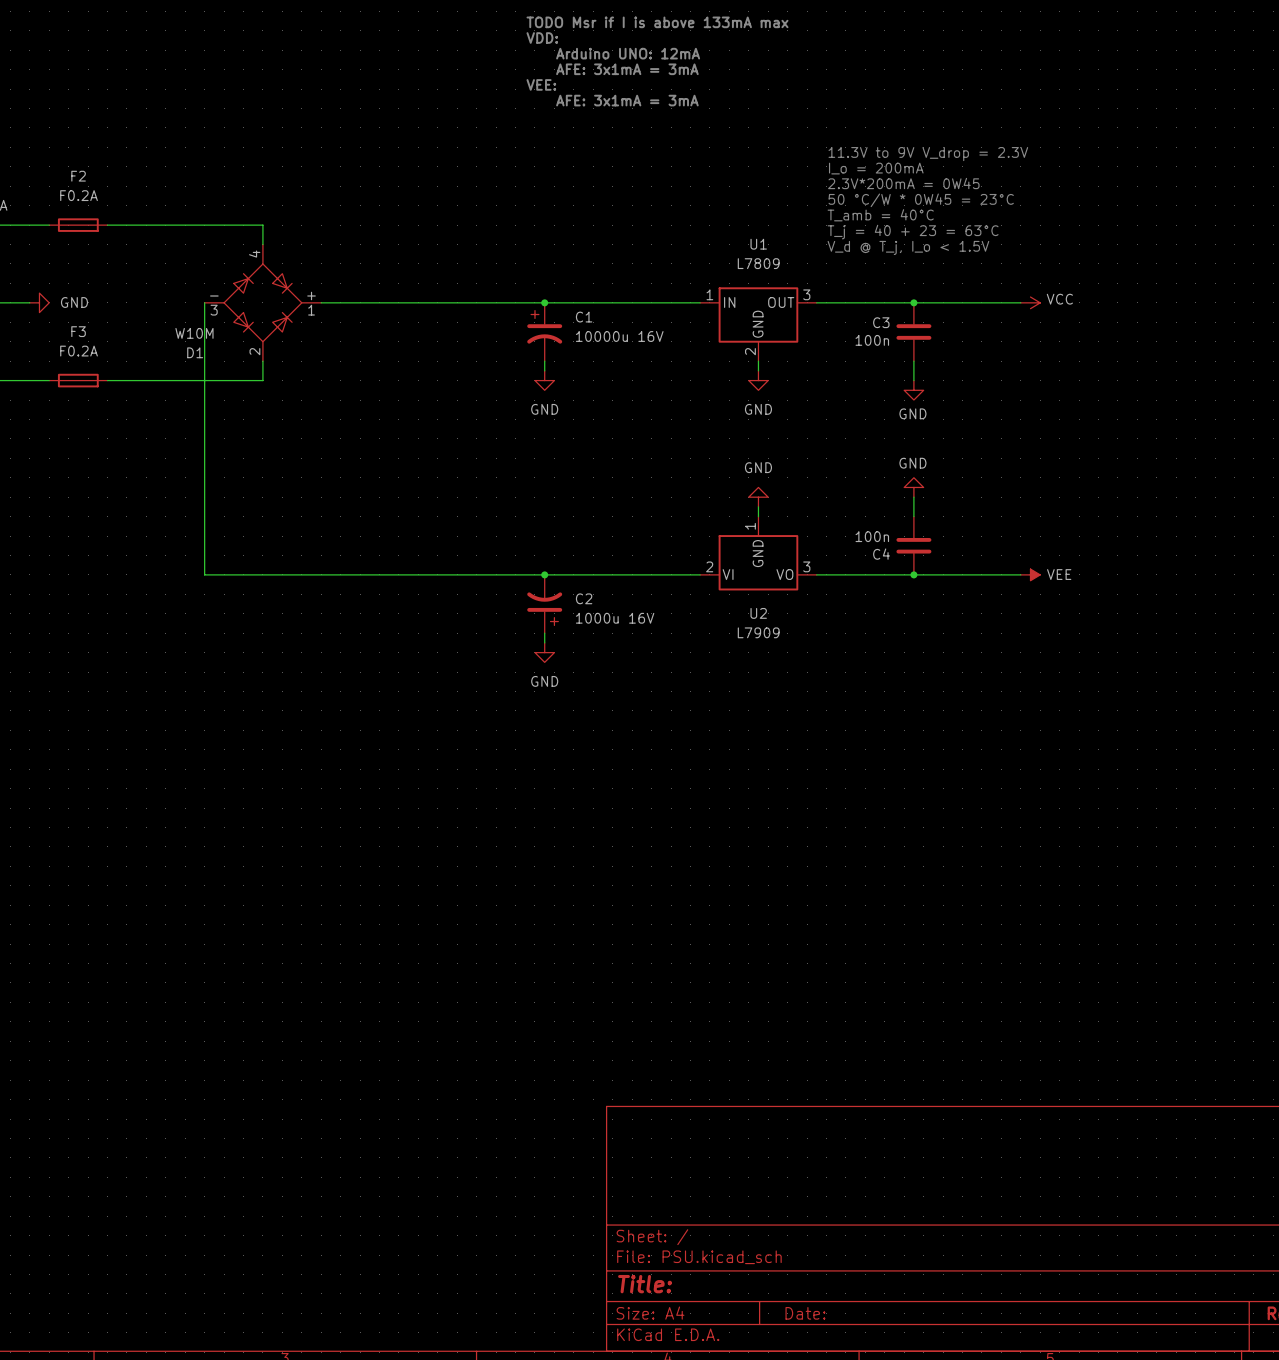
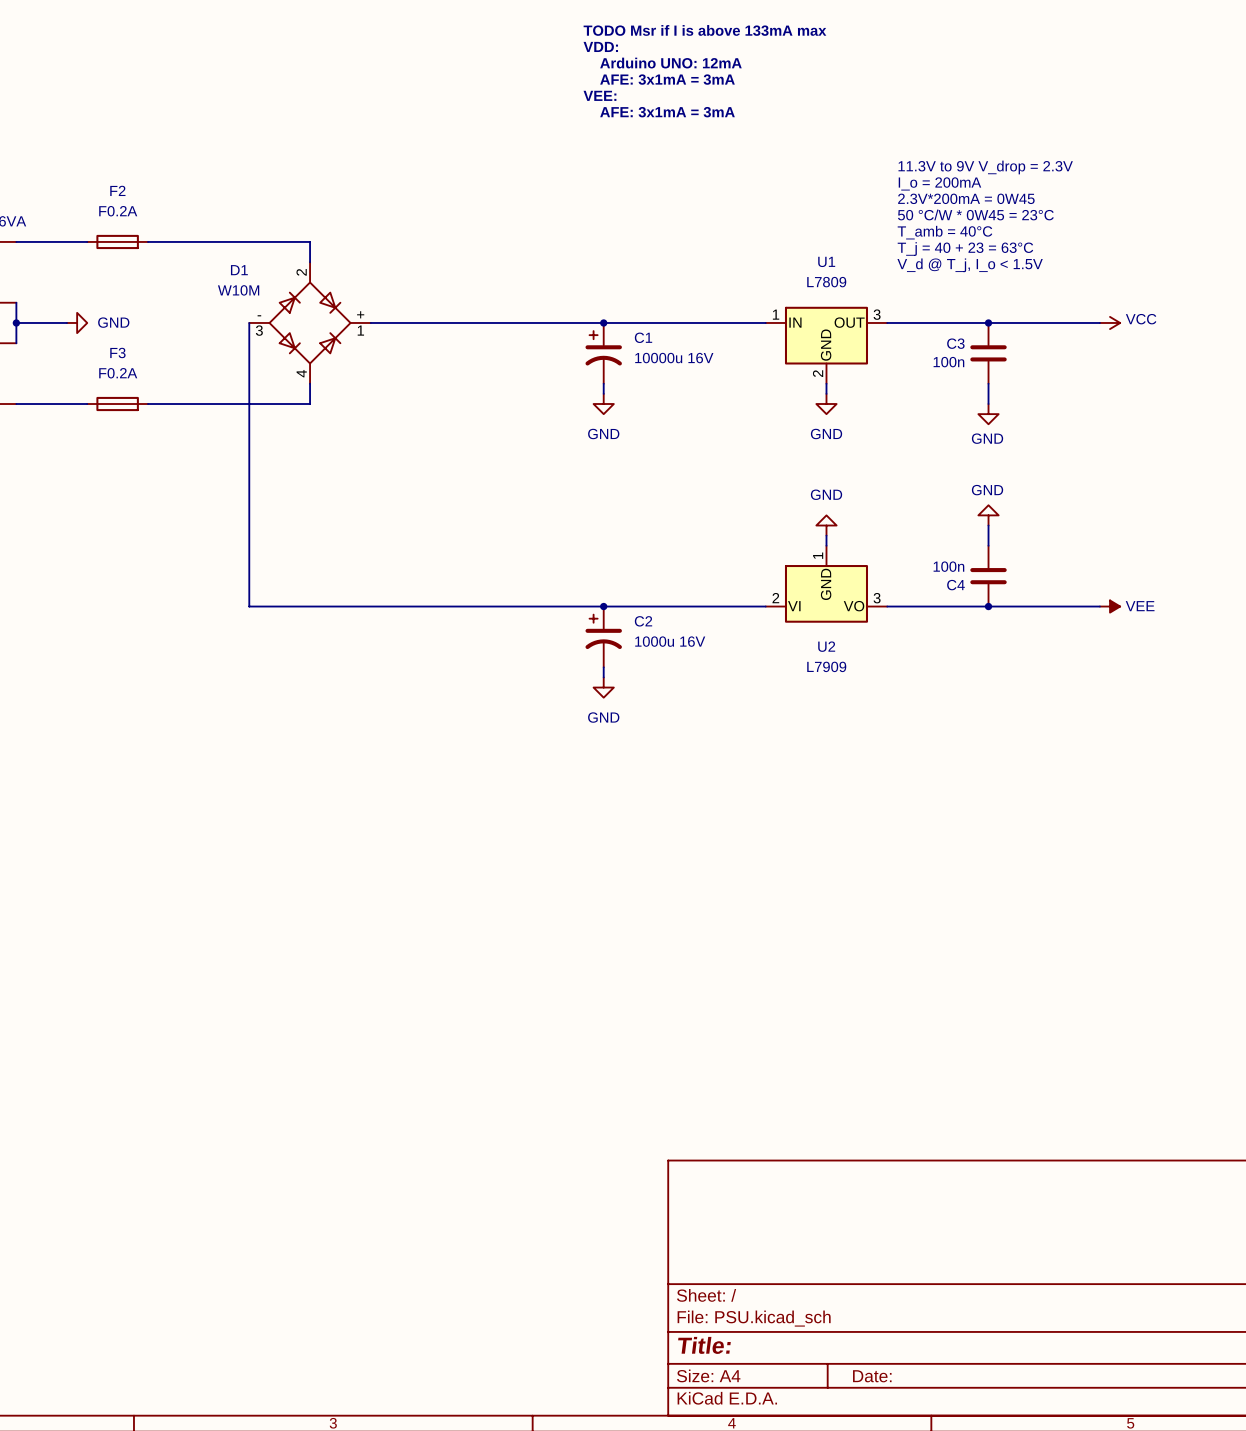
D1 flip: as is (262, 302) -> up-down (310, 322)
C2 rotation: 0° (544, 608) -> 180° (603, 631)

